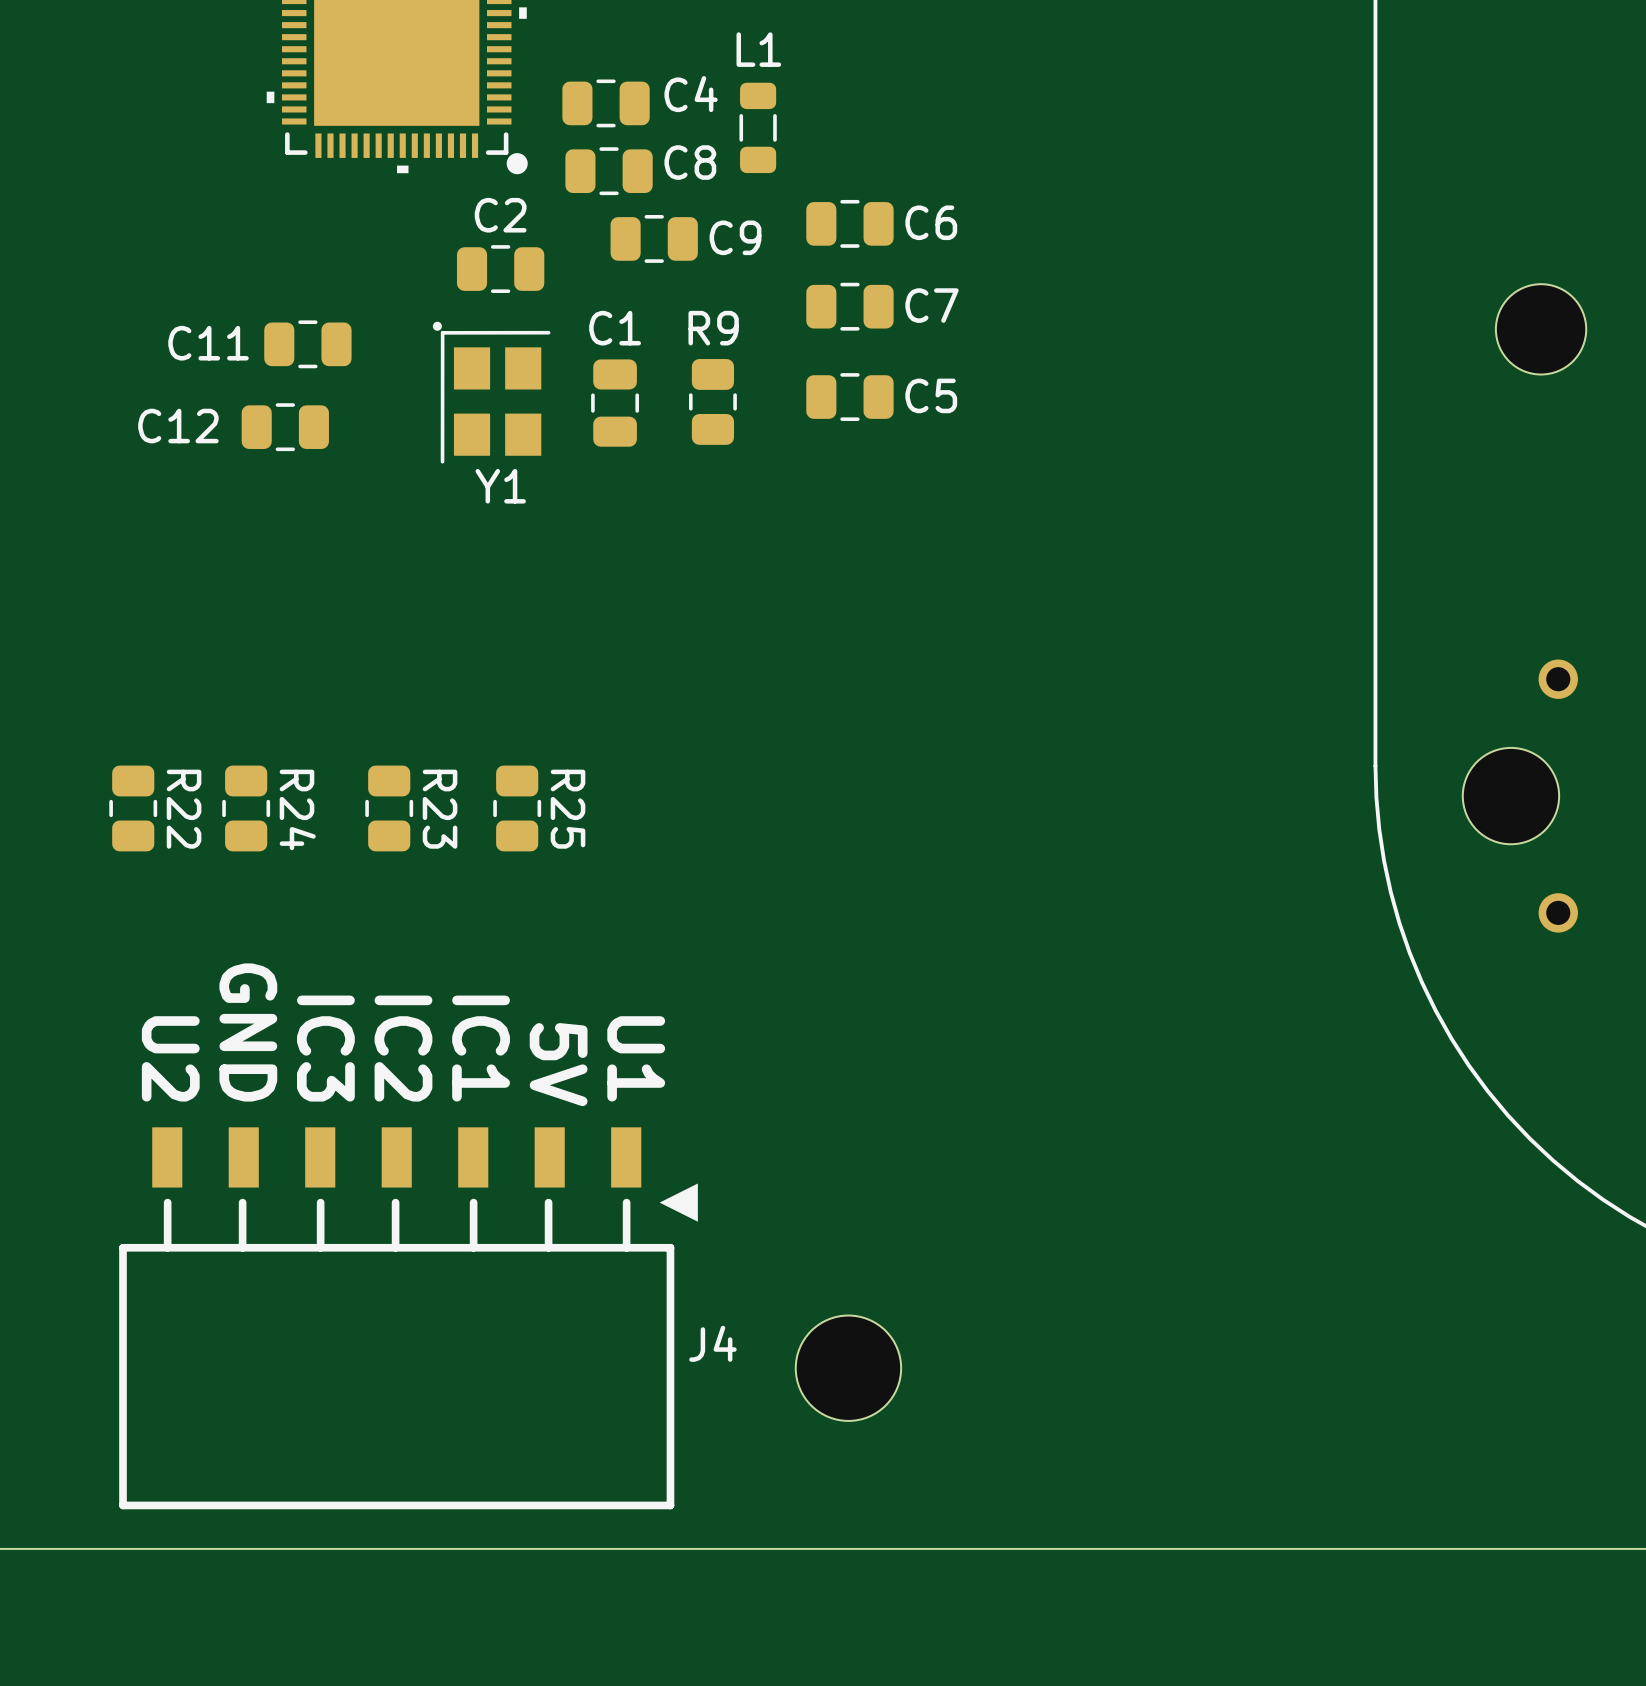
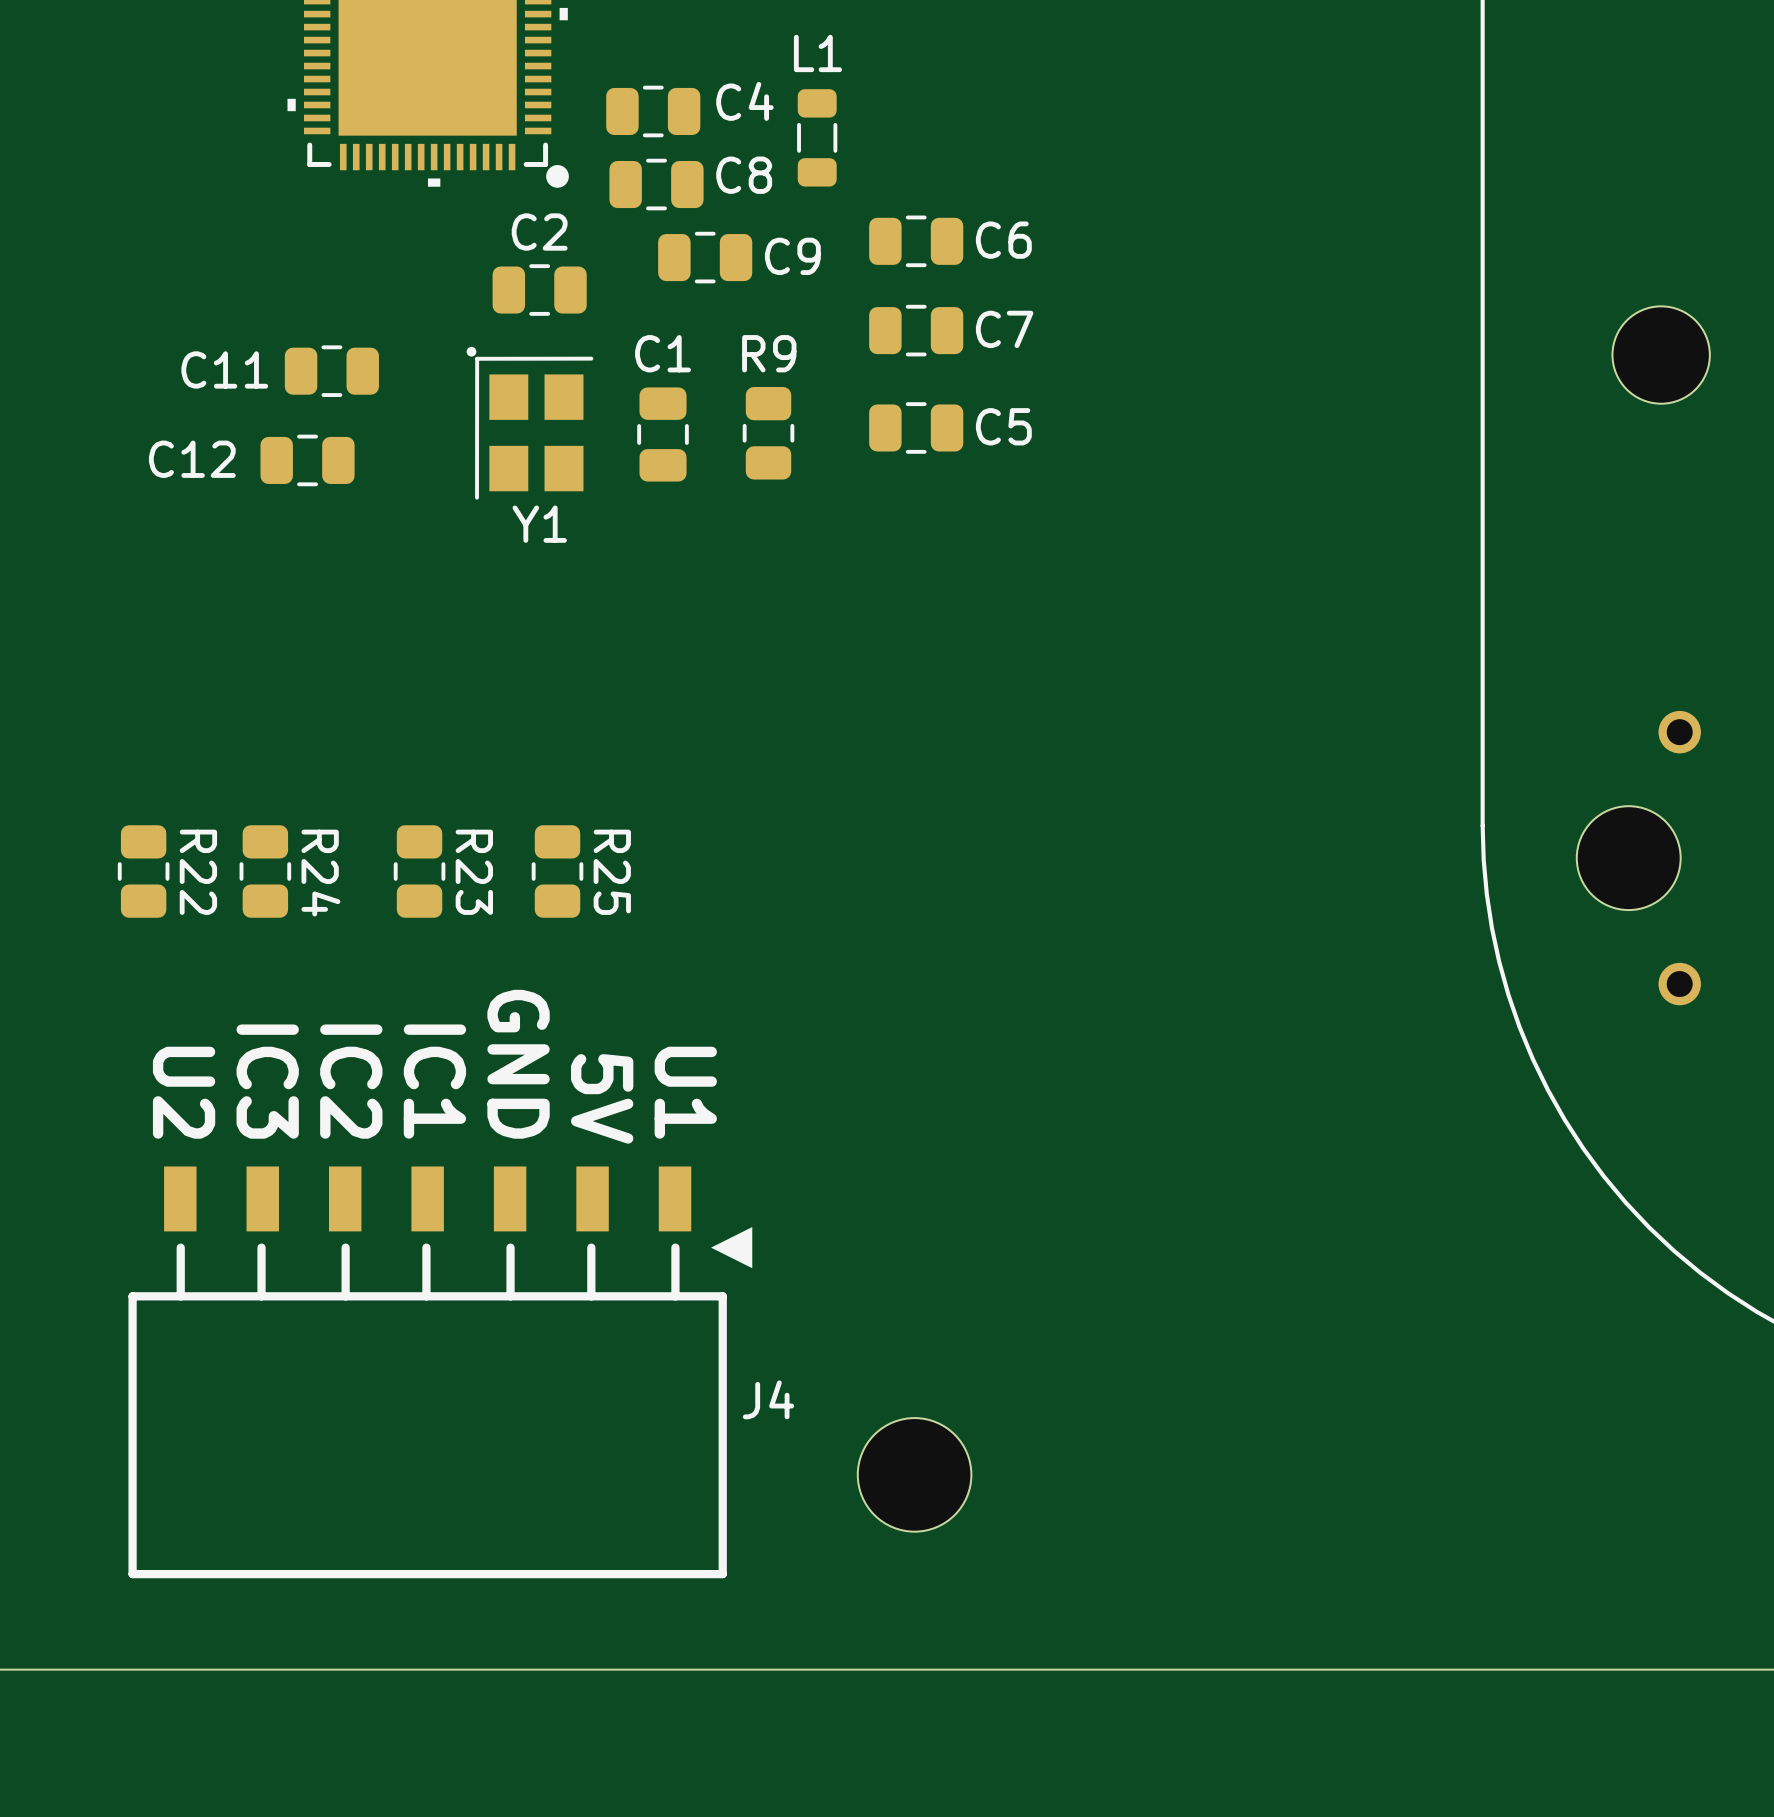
text position: GND (248, 1032) -> GND (518, 1064)
text position: IC3 (325, 1048) -> IC3 (267, 1081)
text position: IC2 (403, 1048) -> IC2 (351, 1081)
text position: IC1 (481, 1048) -> IC1 (434, 1081)
text position: U2 (170, 1058) -> U2 (184, 1092)
text position: U1 (636, 1058) -> U1 (685, 1092)
text position: 5V (558, 1064) -> 5V (602, 1098)
J4 position: (408, 1318) -> (440, 1372)

